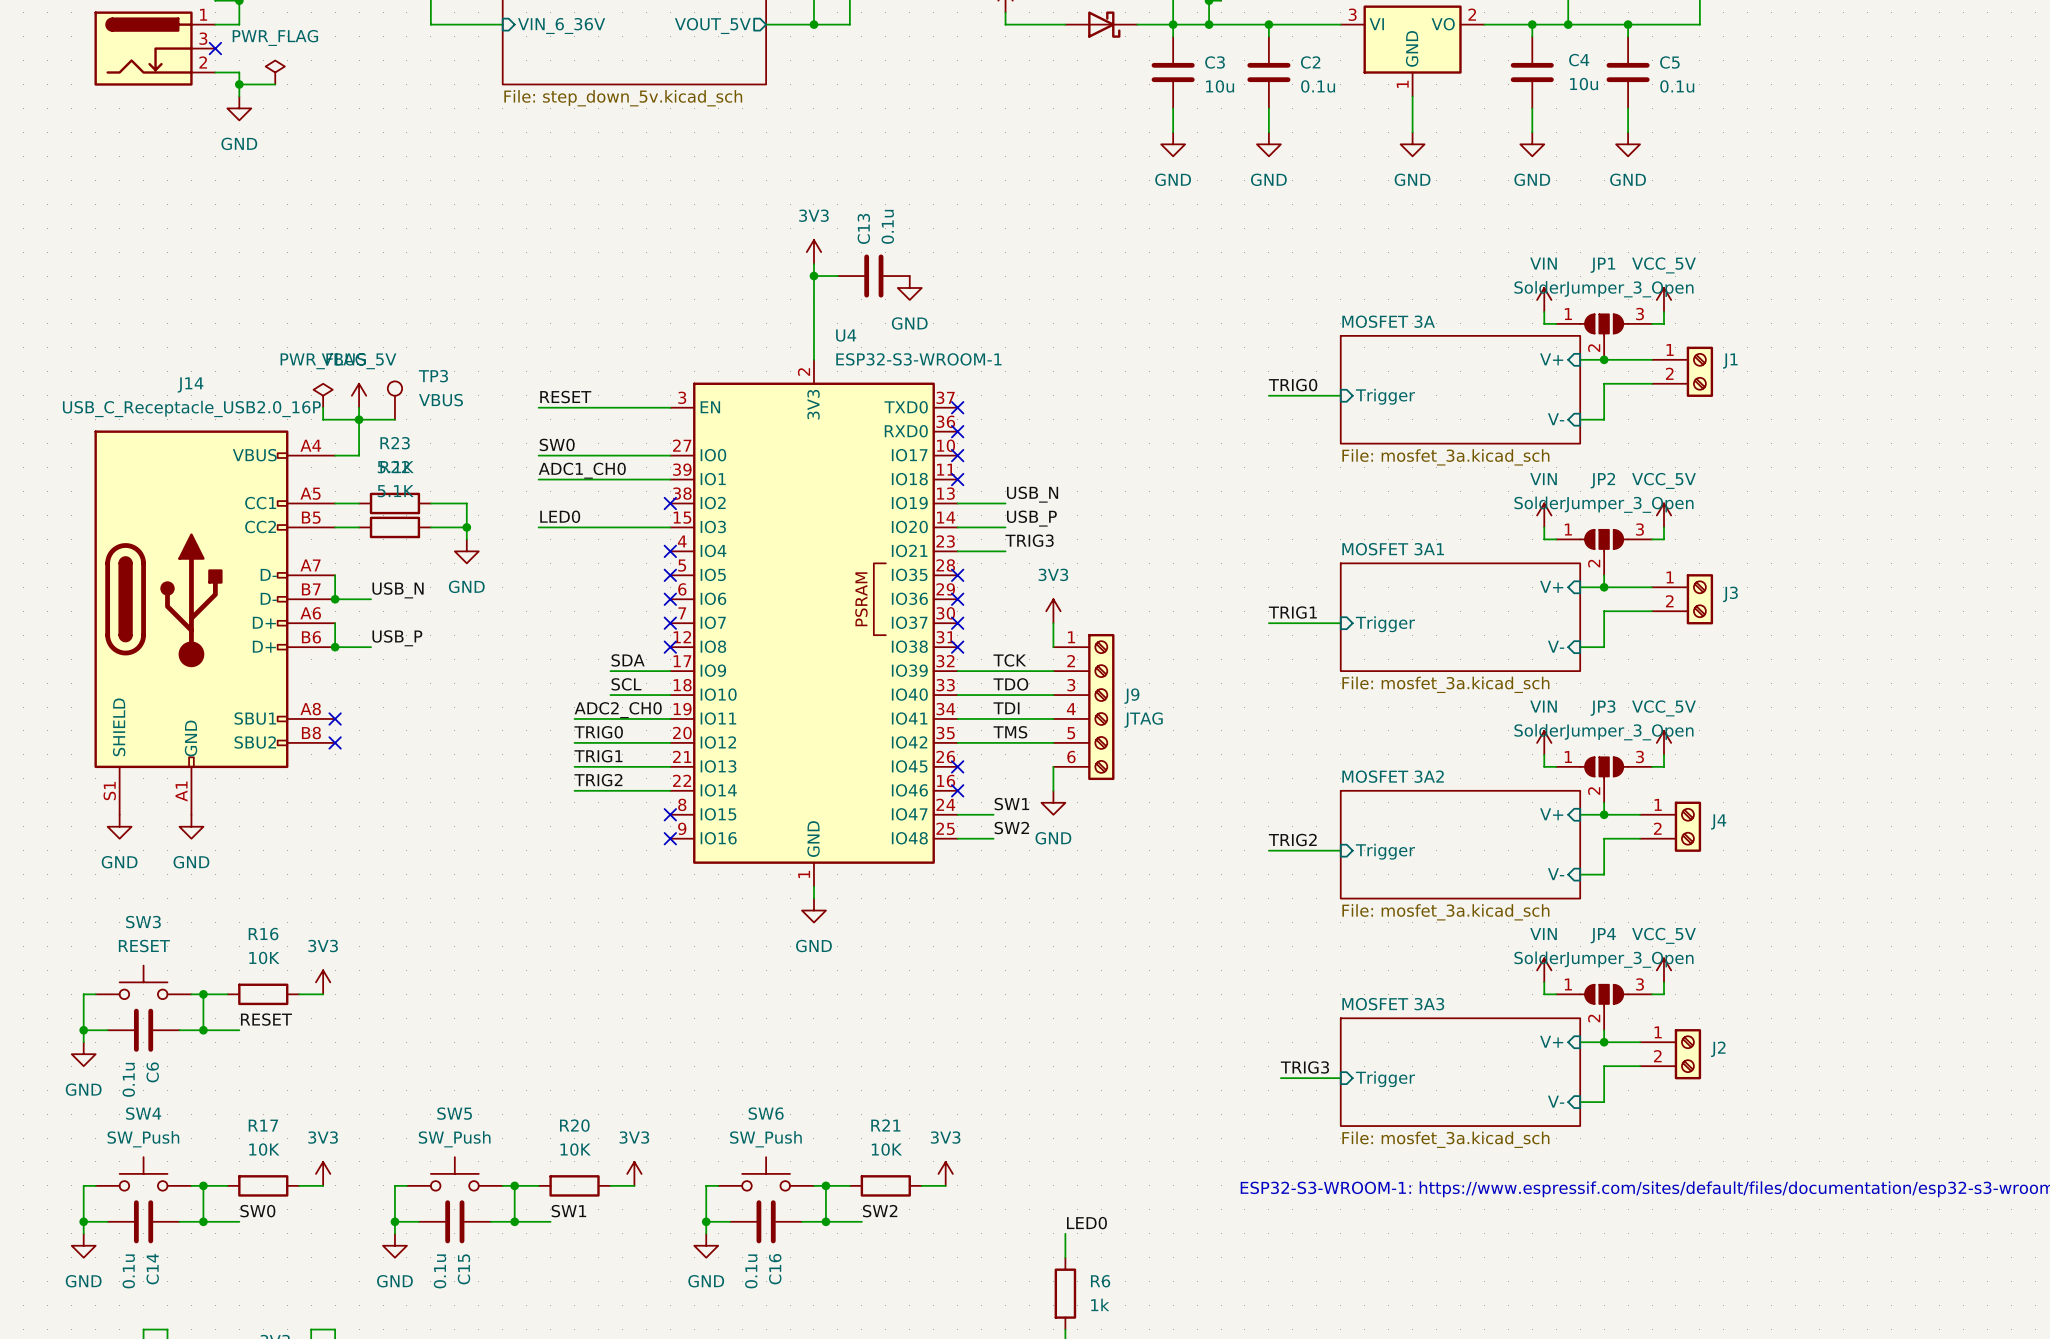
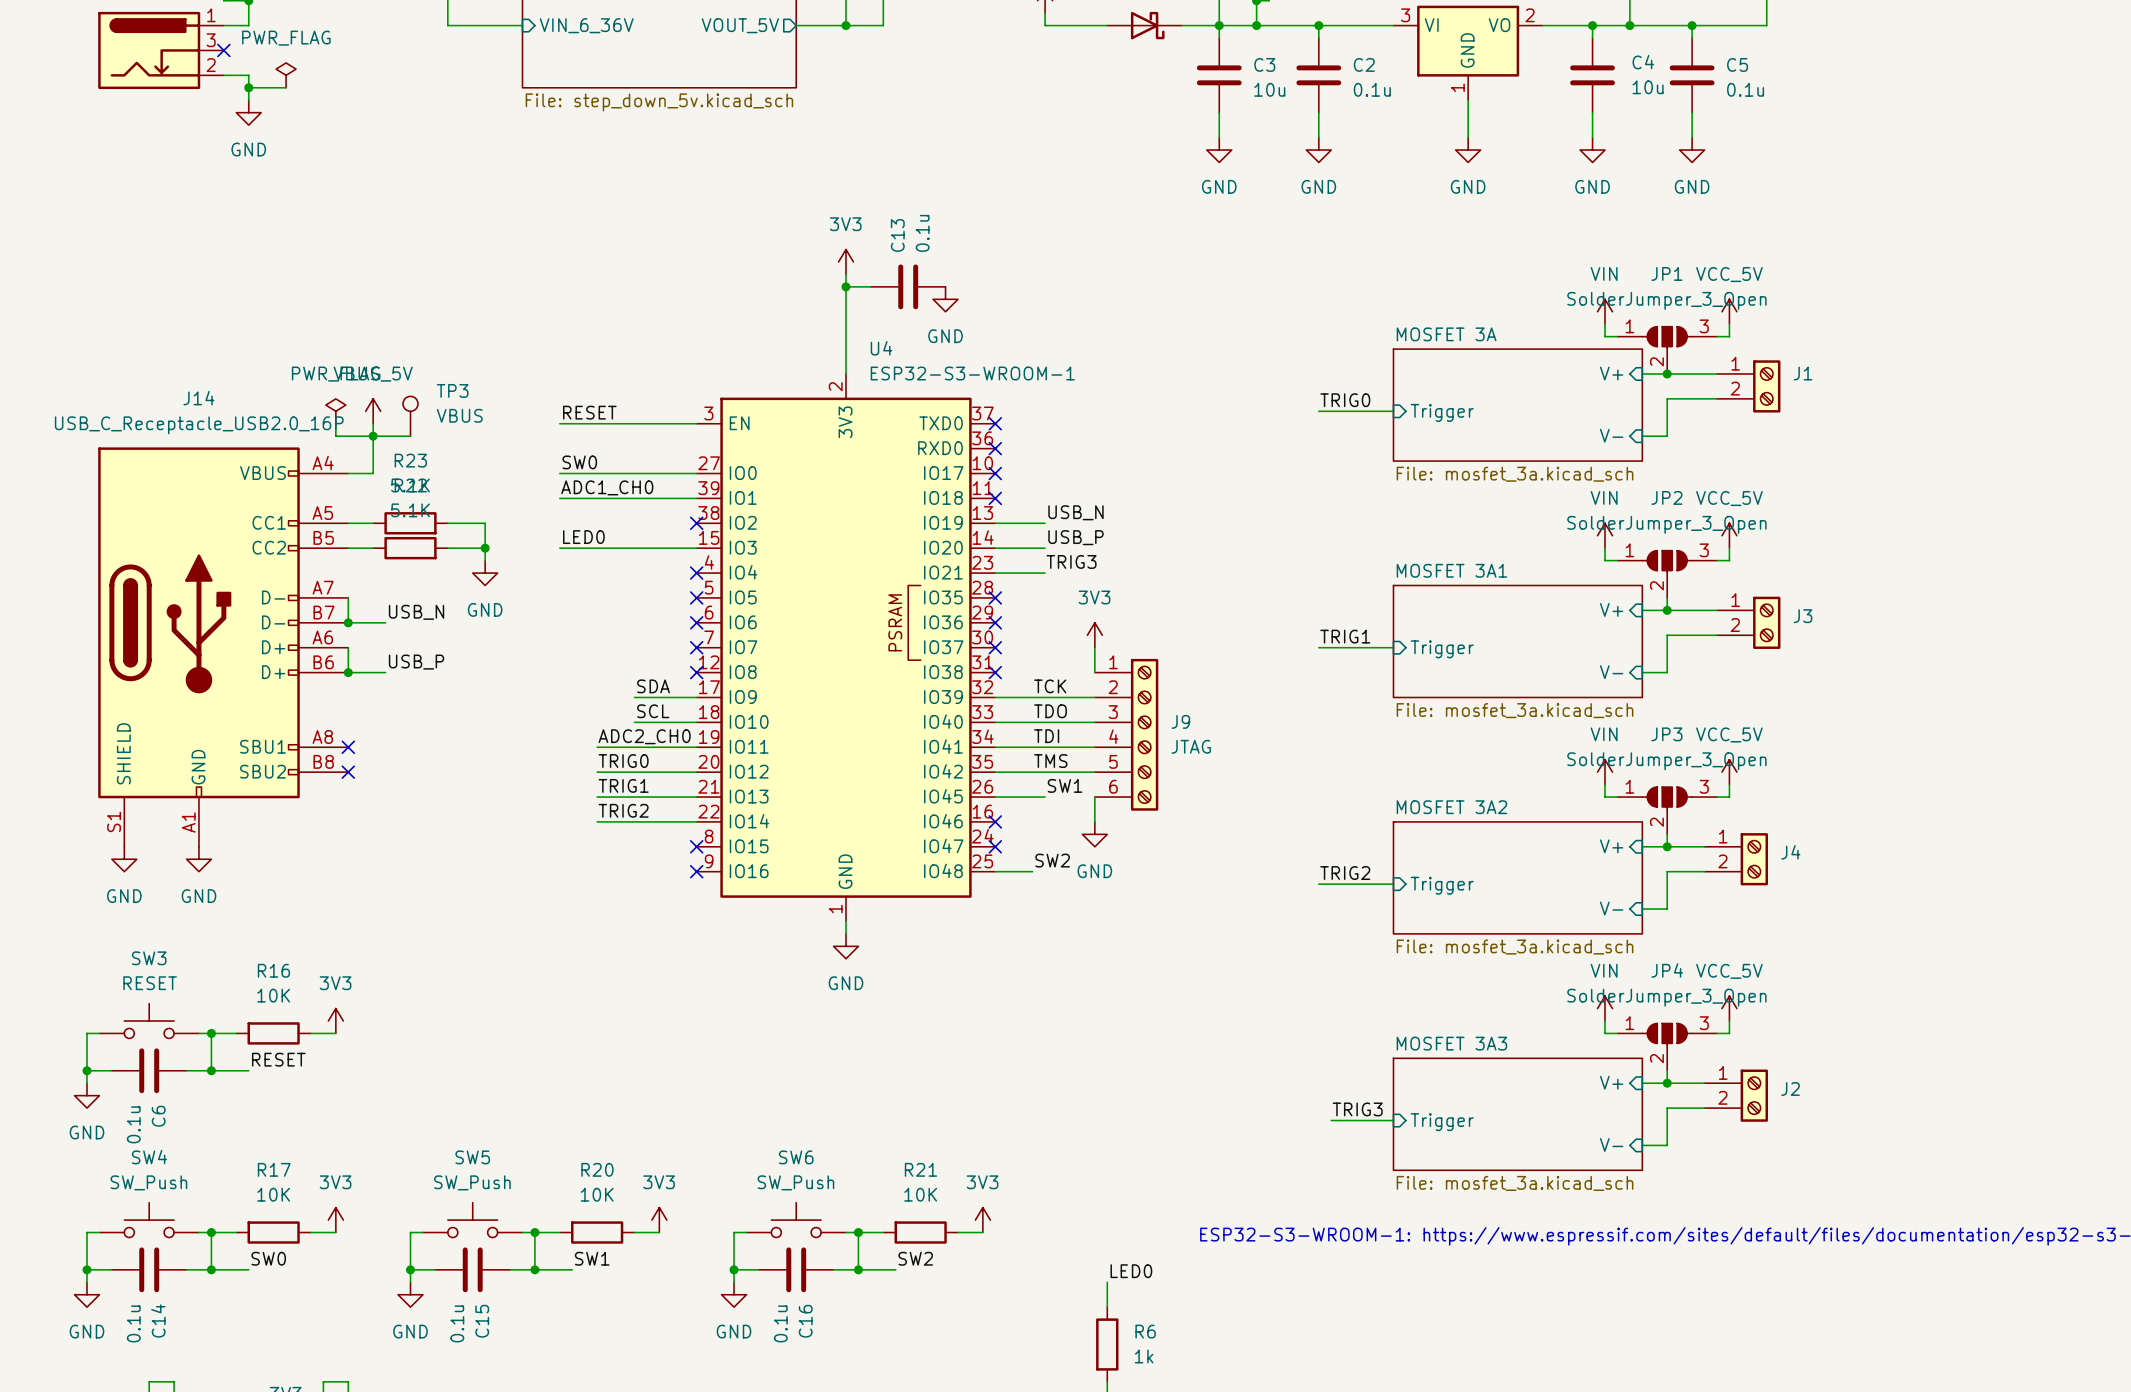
wire: none -> (995, 797) (1045, 797)
no-connect mark position: (957, 766) -> (995, 846)
label position: SW1 (1011, 804) -> SW1 (1065, 785)
wire: (957, 814) (993, 814) -> none

